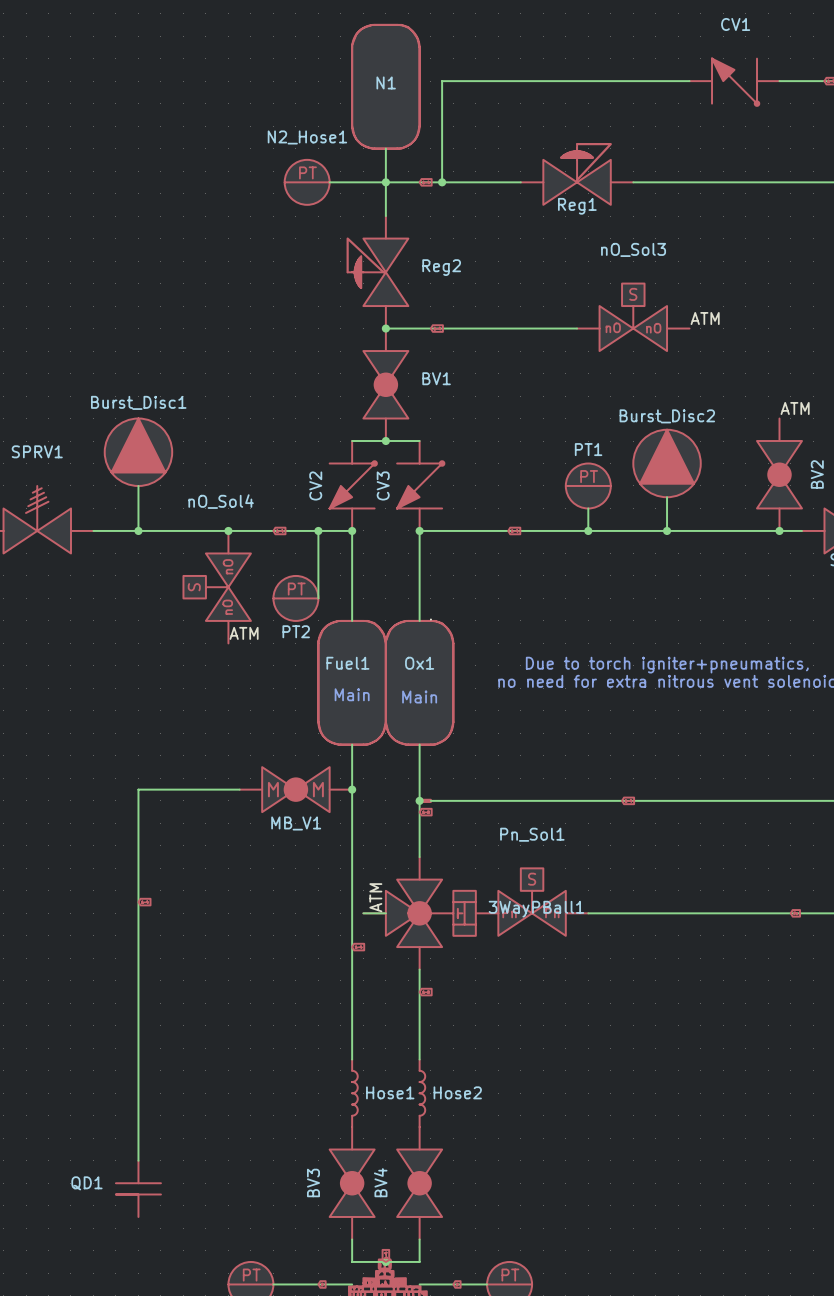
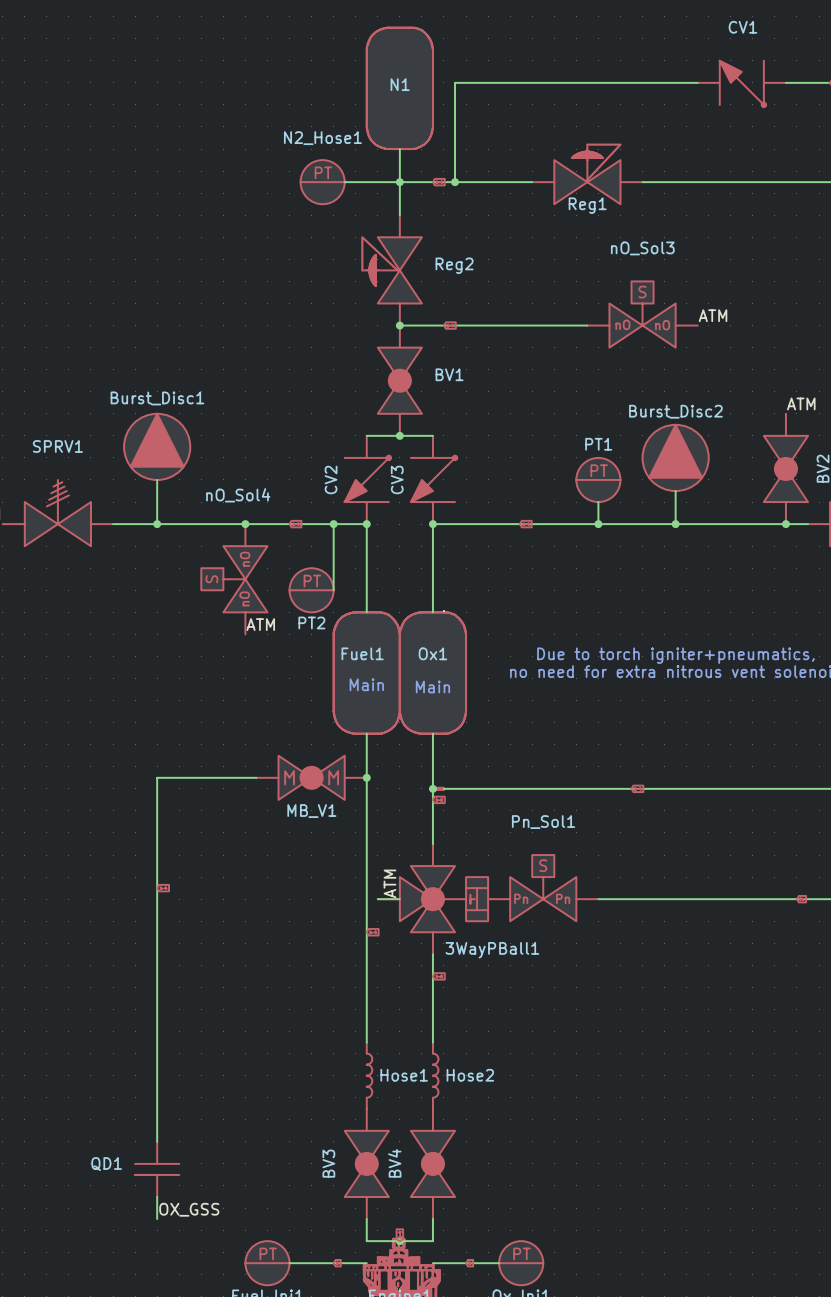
3WayPBall1 name position: 3WayPBall1 (536, 909) -> 3WayPBall1 (492, 950)
wire: none -> (157, 1197) (157, 1219)
label: none -> OX_GSS (189, 1209)

